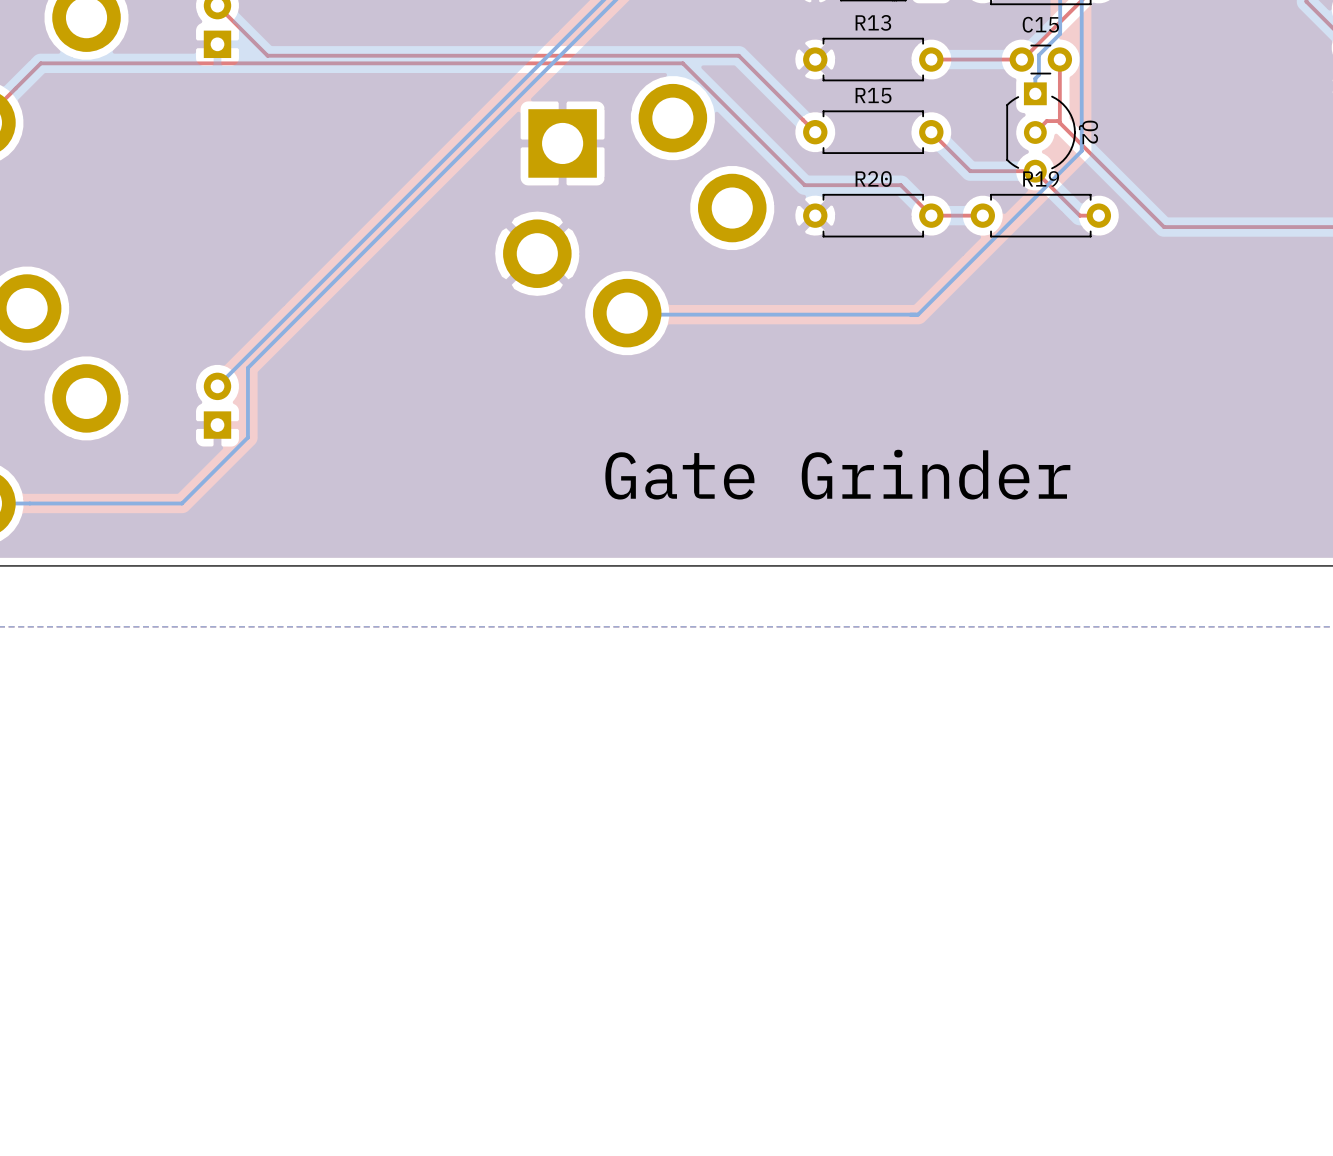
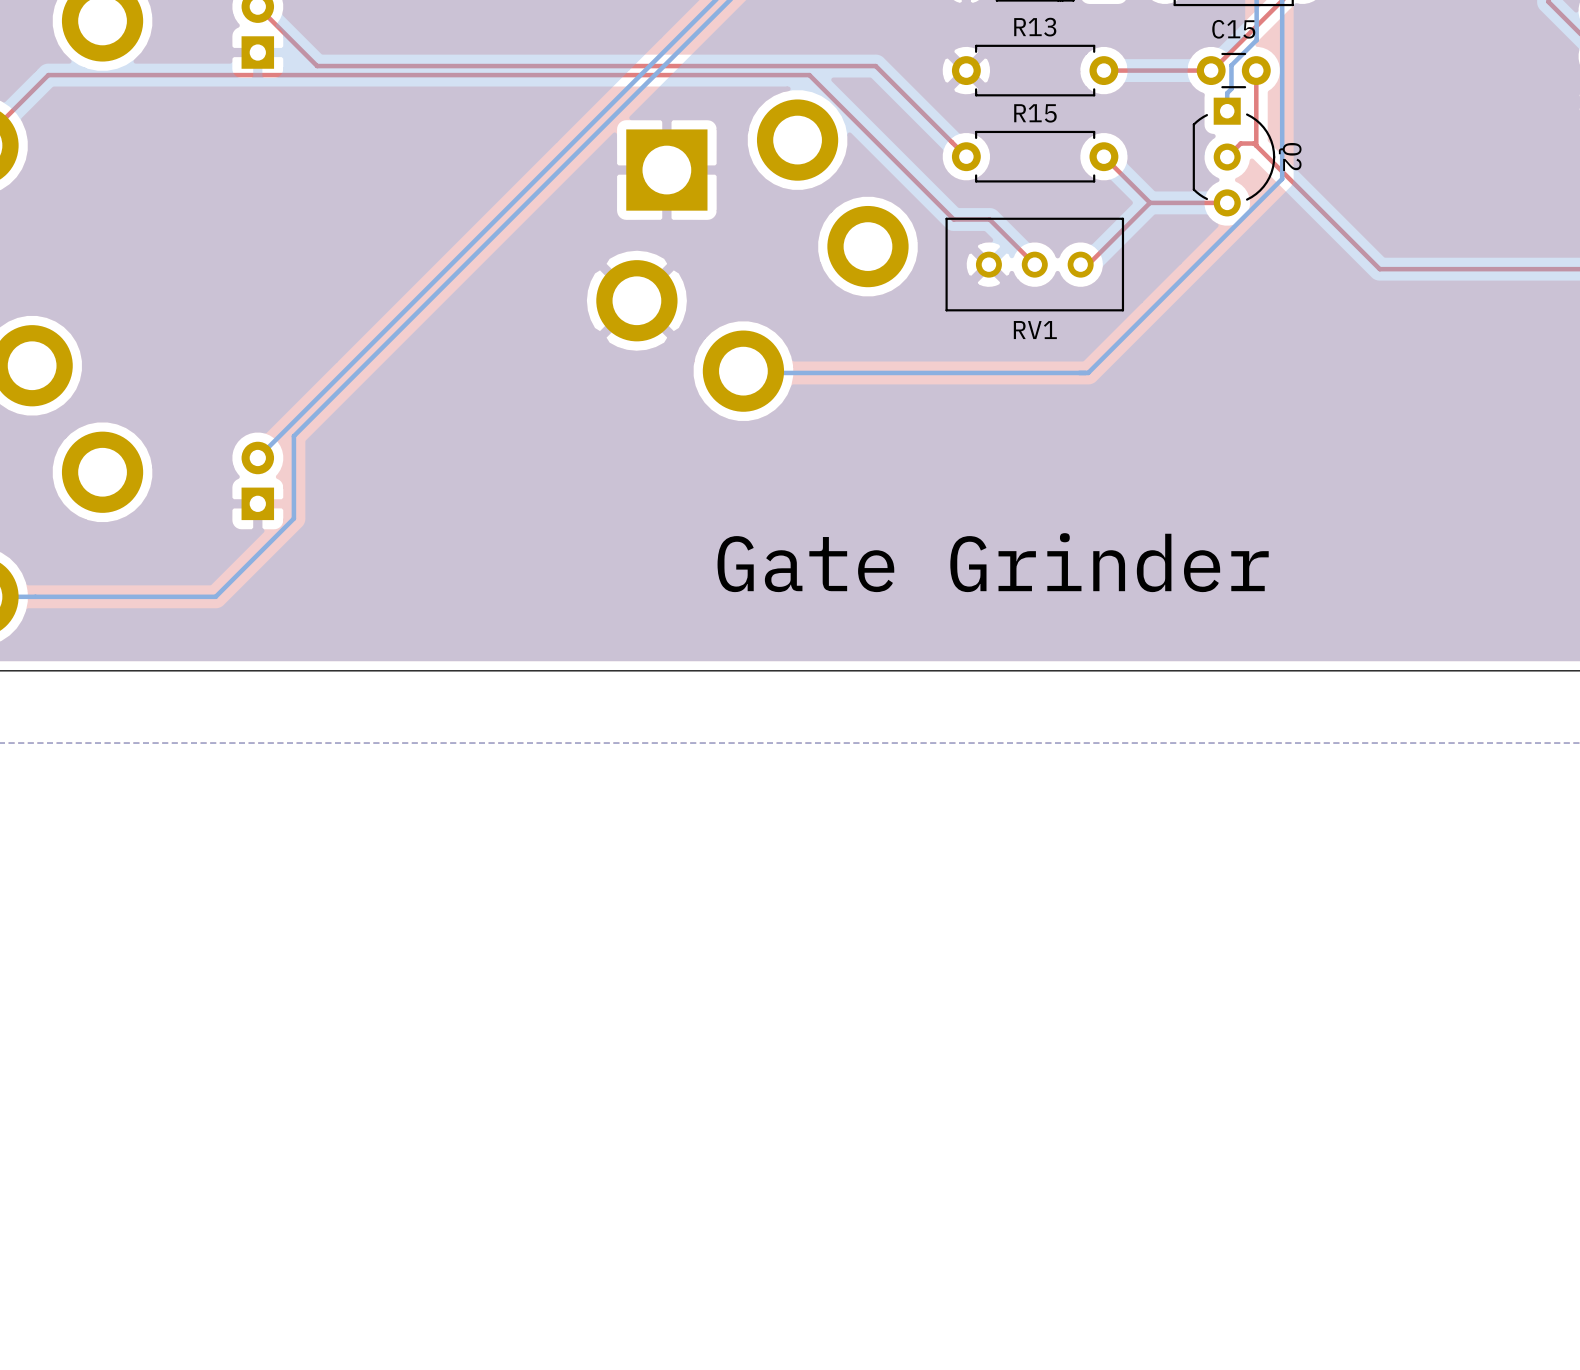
top track: none -> (1150, 202) (1088, 264) (1080, 264)
top track: (1035, 171) (1079, 215) (1098, 215) -> none
top track: (834, 185) (900, 185) (931, 215) (982, 215) -> (989, 219) (1034, 264)
R20: (873, 215) -> none
R19: (1040, 215) -> none
RV1: none -> (1034, 264)

